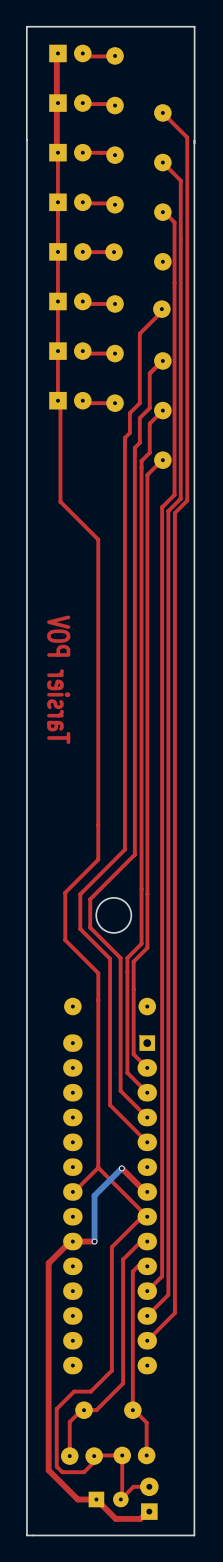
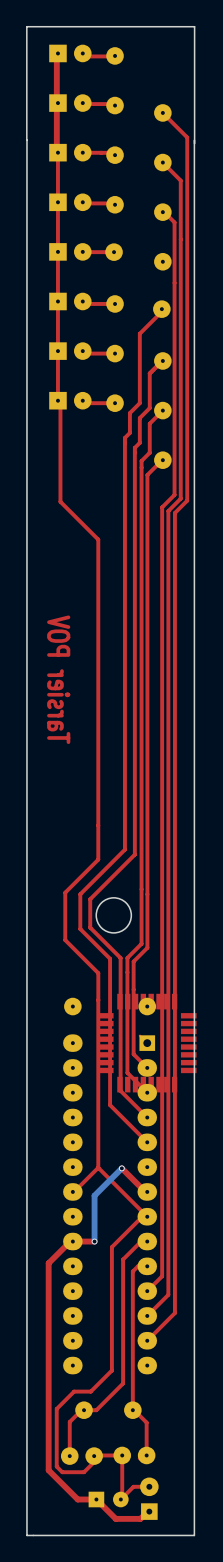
part: none -> (147, 1043)

